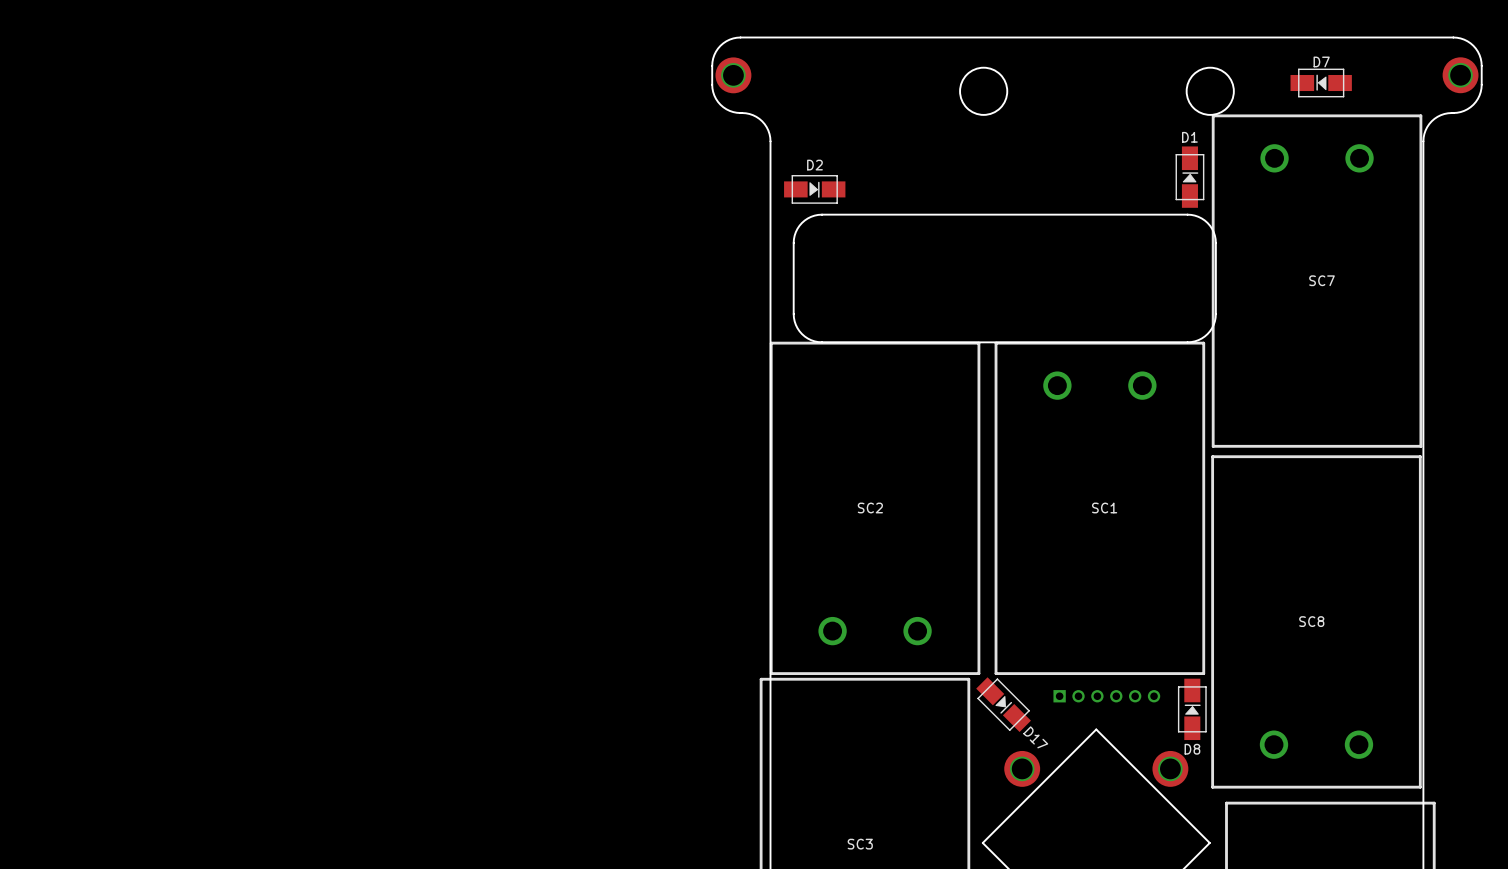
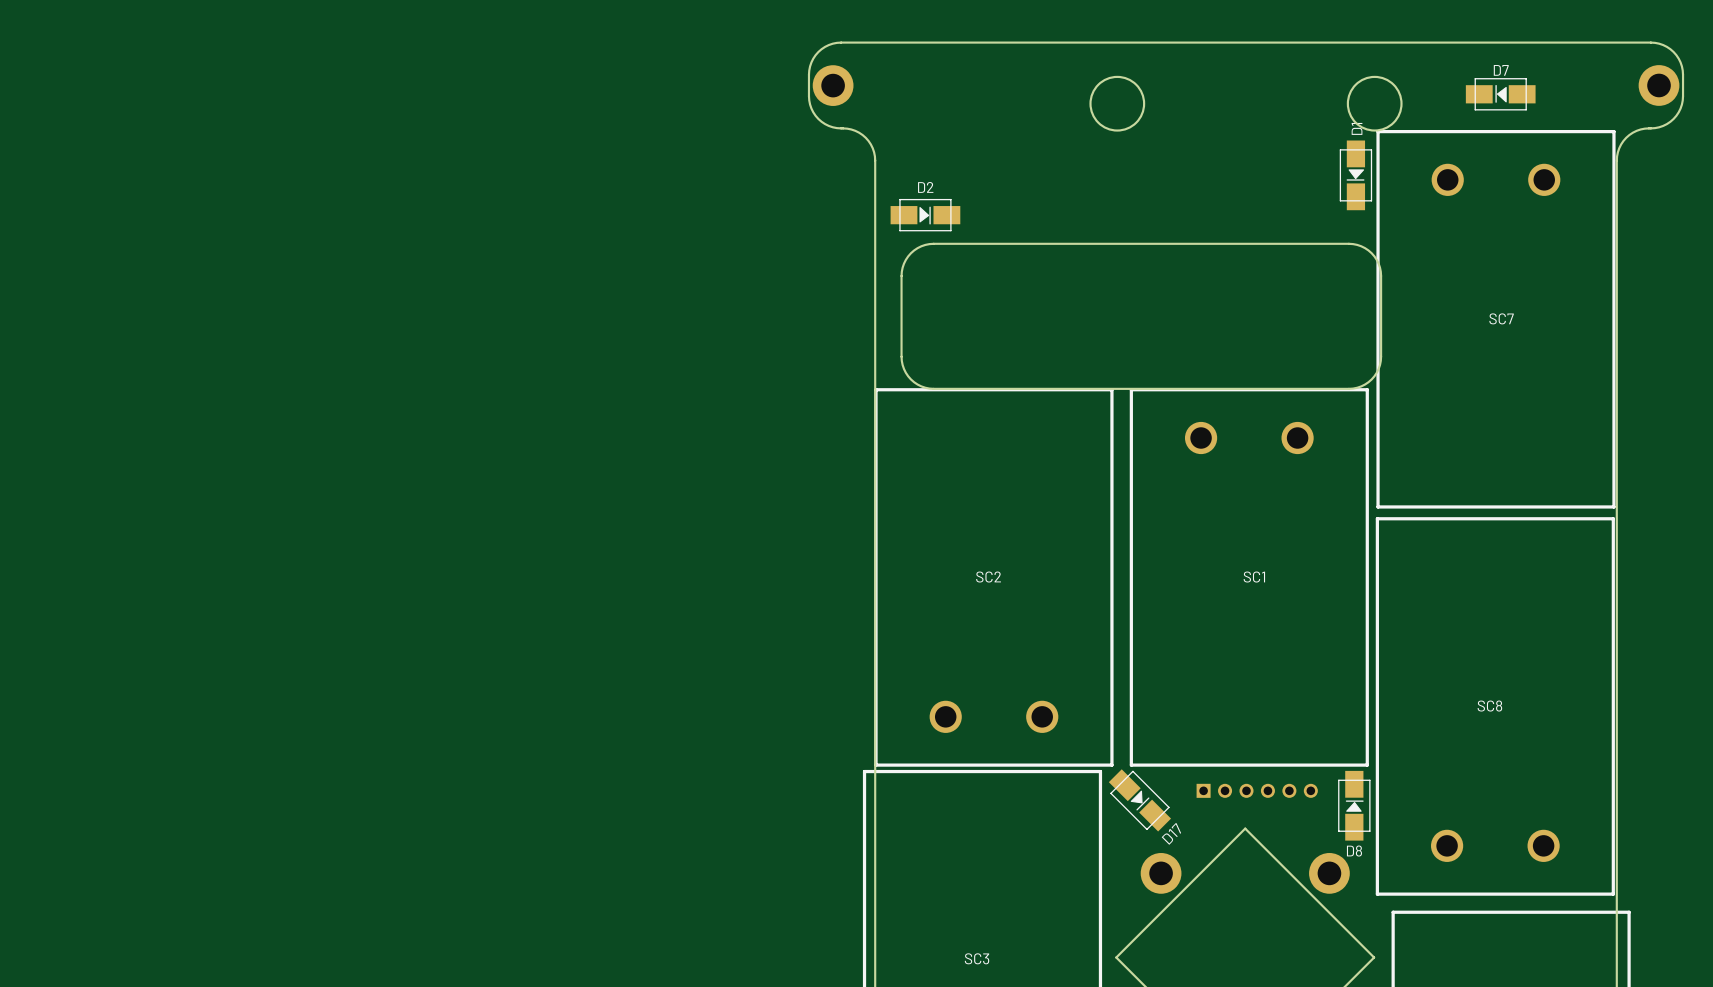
D1 rotation: 0° (1189, 177) -> 180° (1355, 175)
D17 name rotation: 0° (1035, 737) -> 90° counterclockwise (1171, 833)

